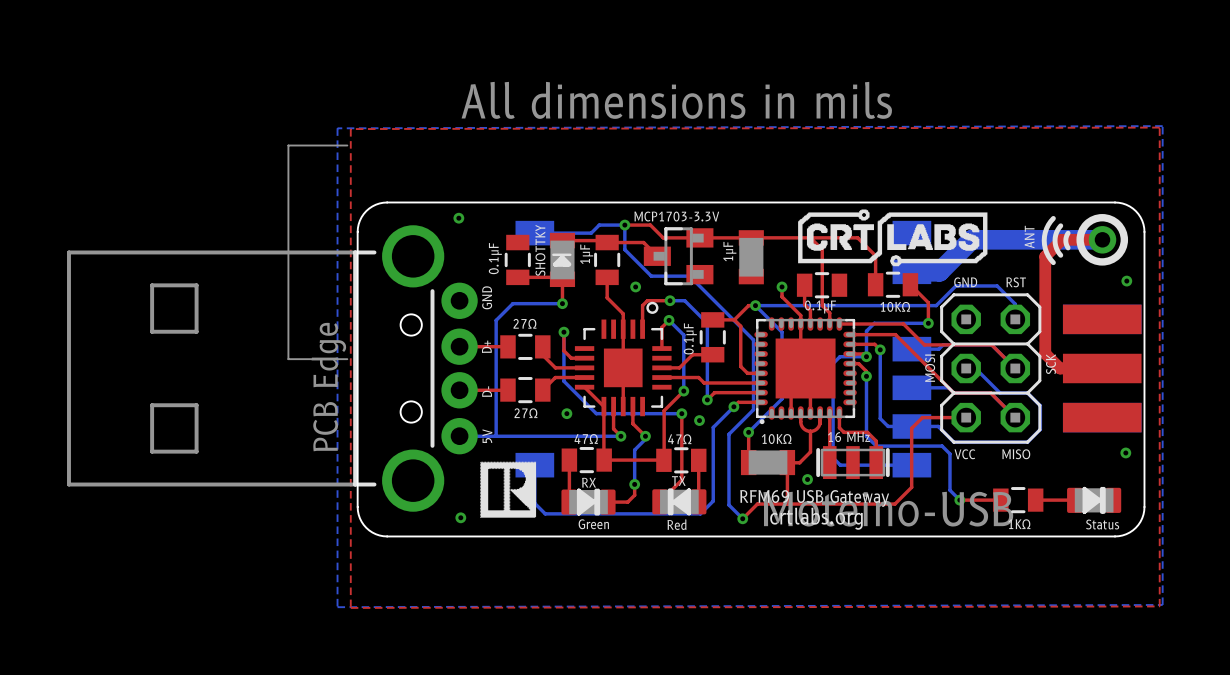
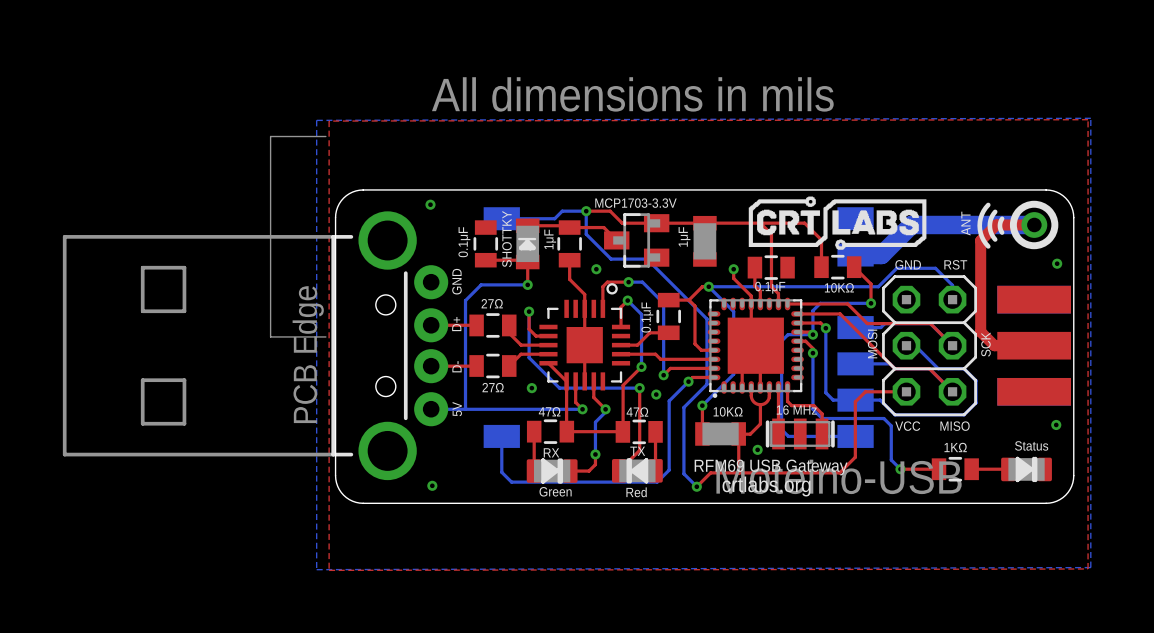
drawing: [480, 461, 537, 518] -> none
part value position: 1KΩ (1019, 524) -> 1KΩ (955, 447)
part value position: Status (1102, 524) -> Status (1031, 445)

